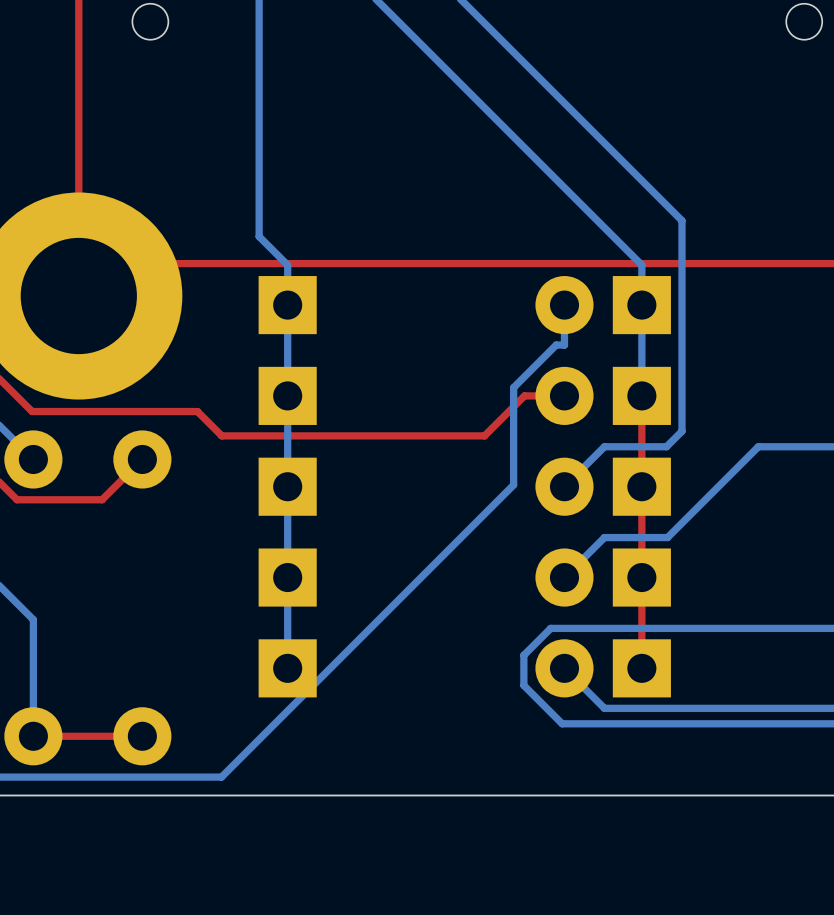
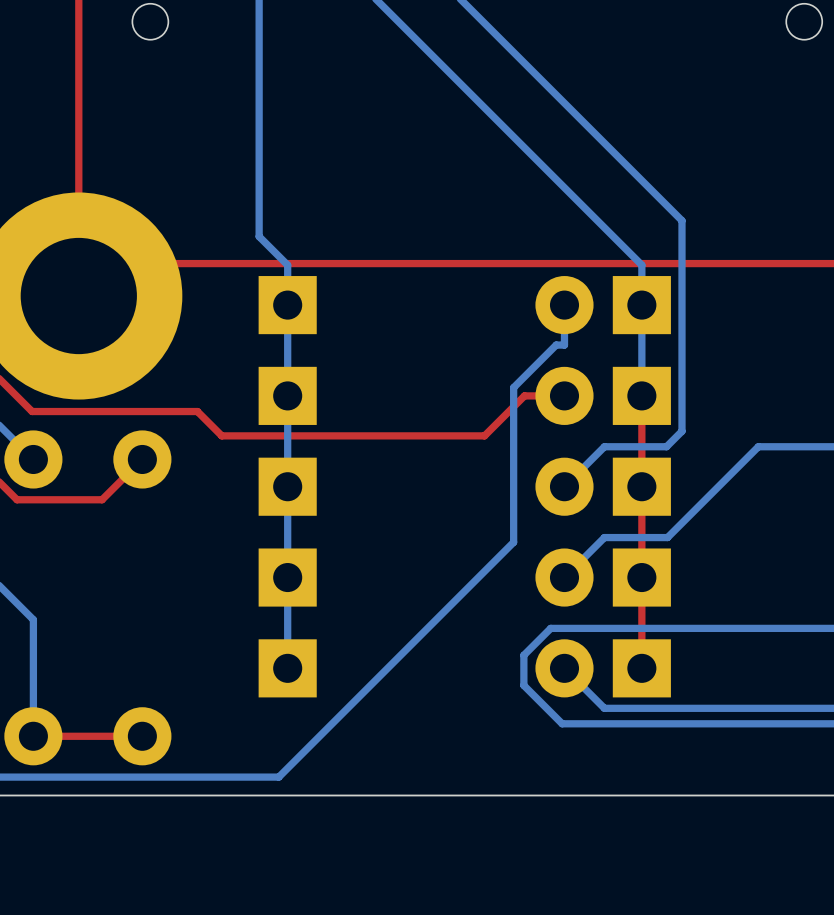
bottom track: (513, 484) (221, 777) -> (513, 484) (513, 542) (278, 777) (221, 777)

